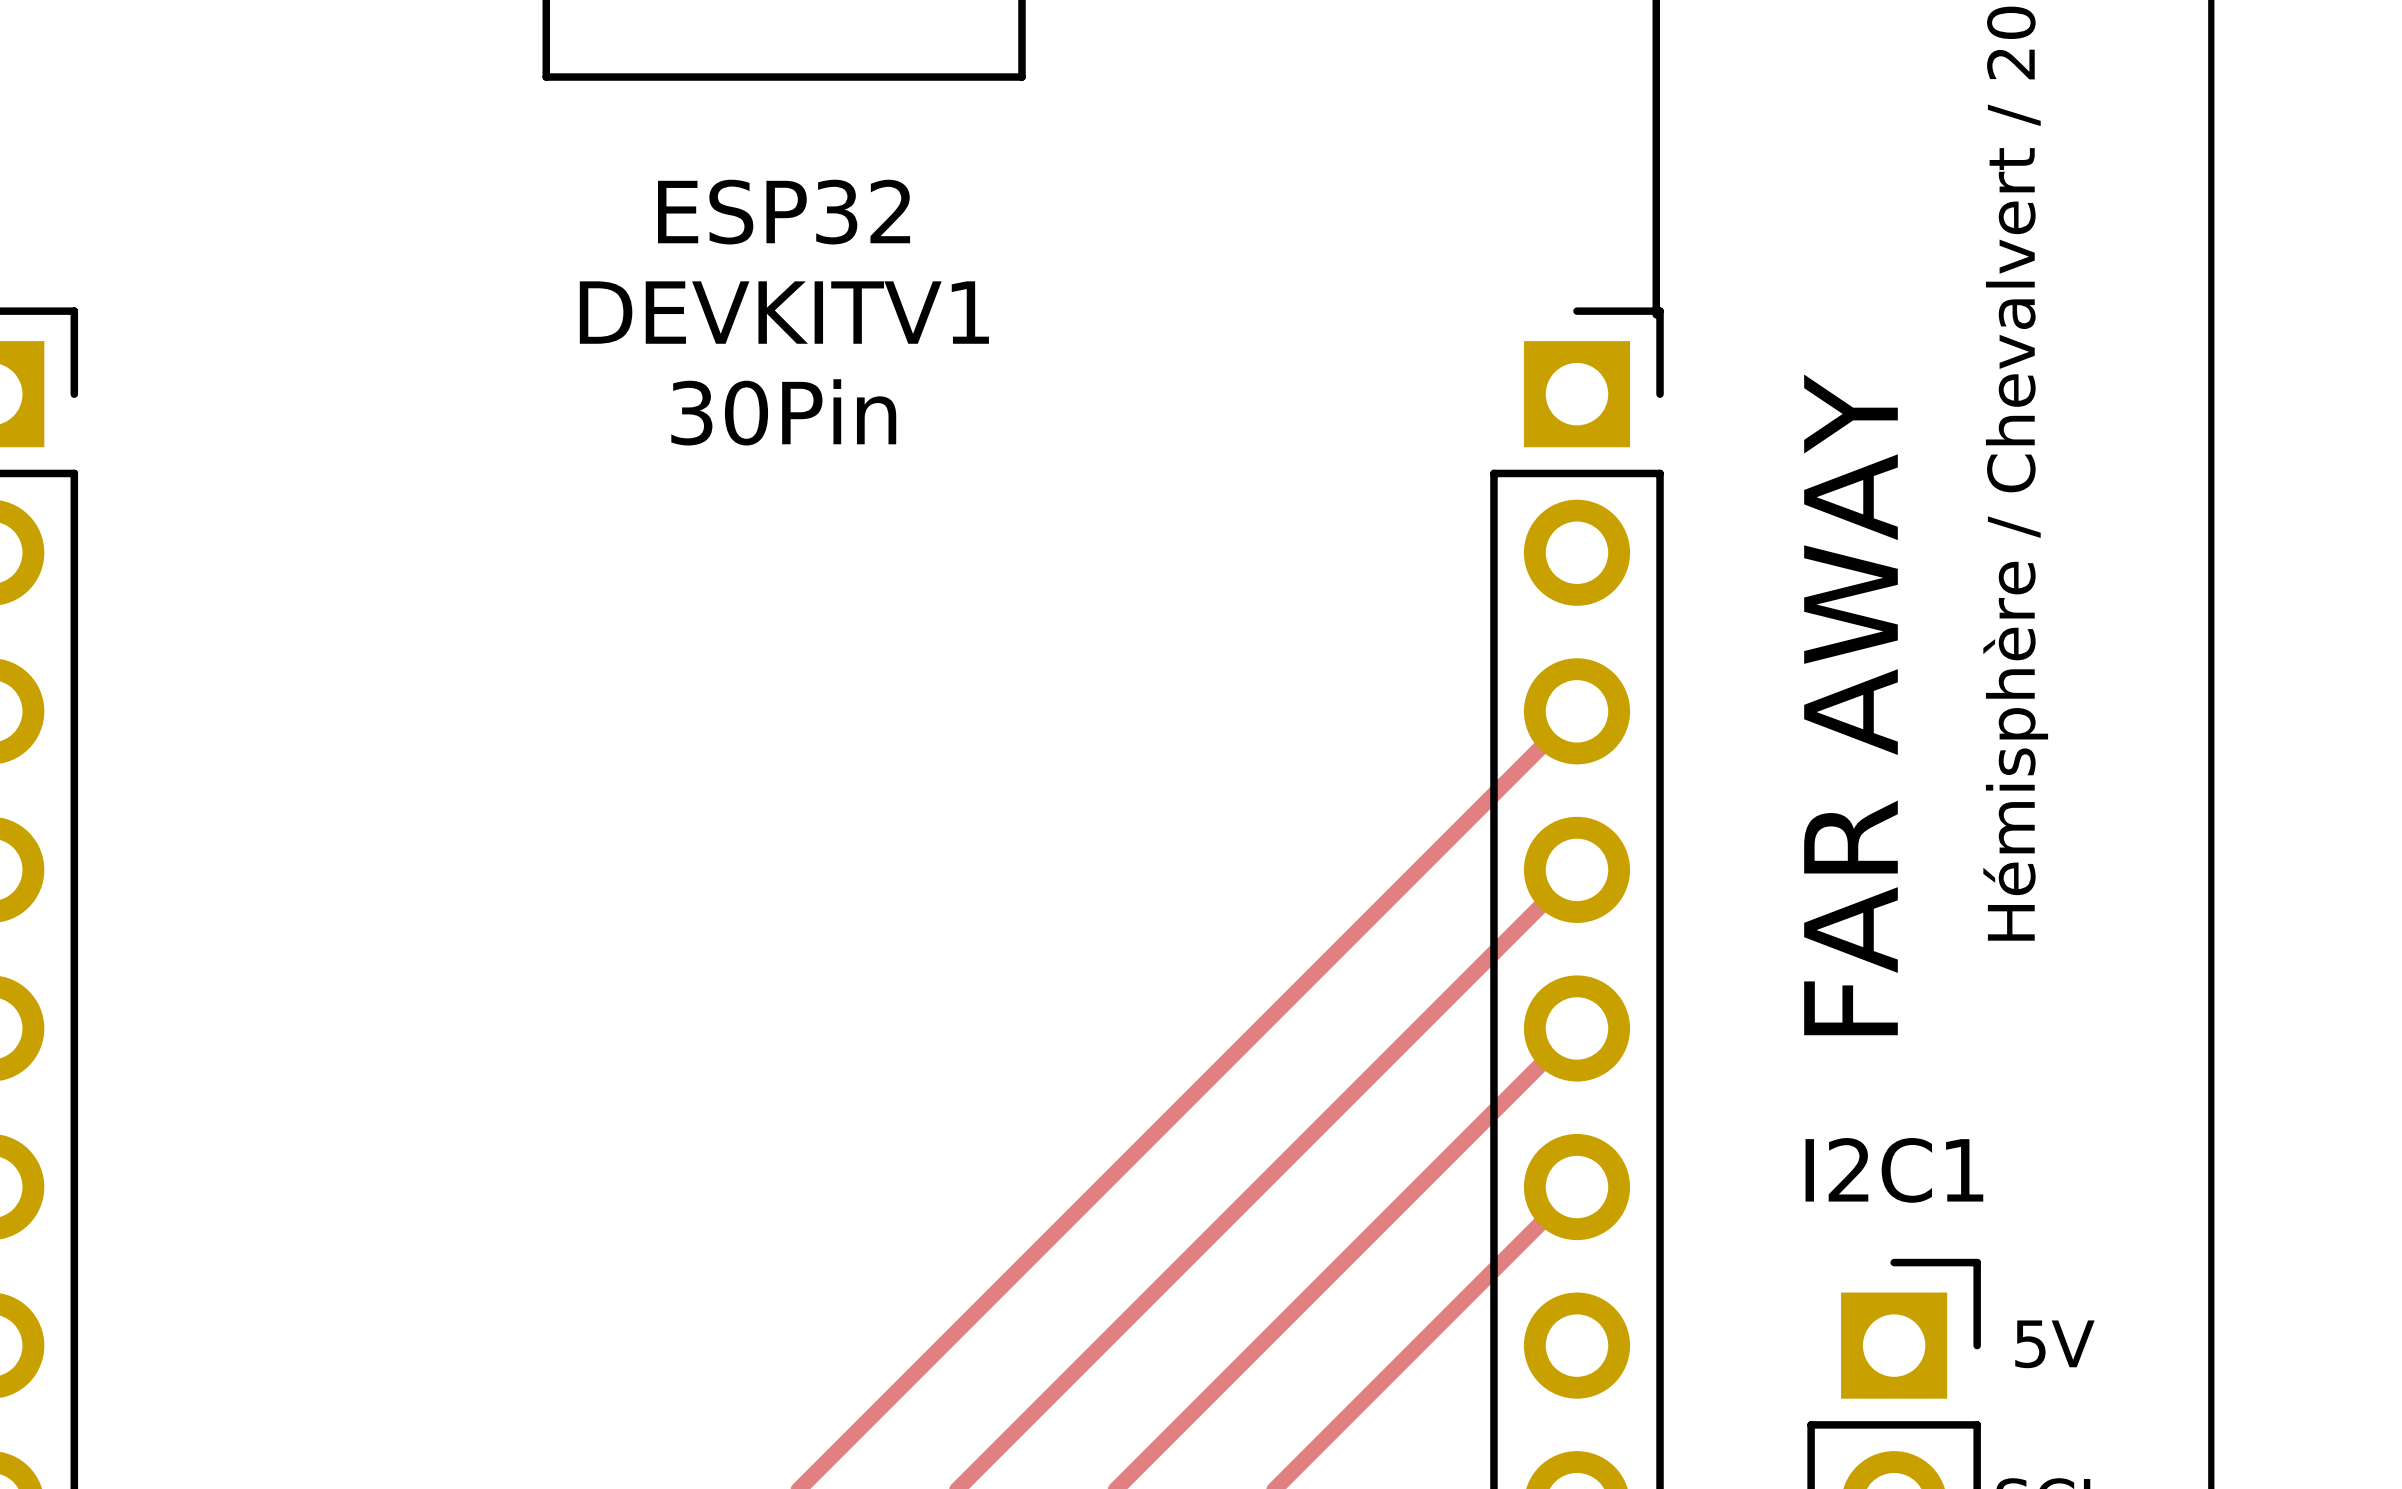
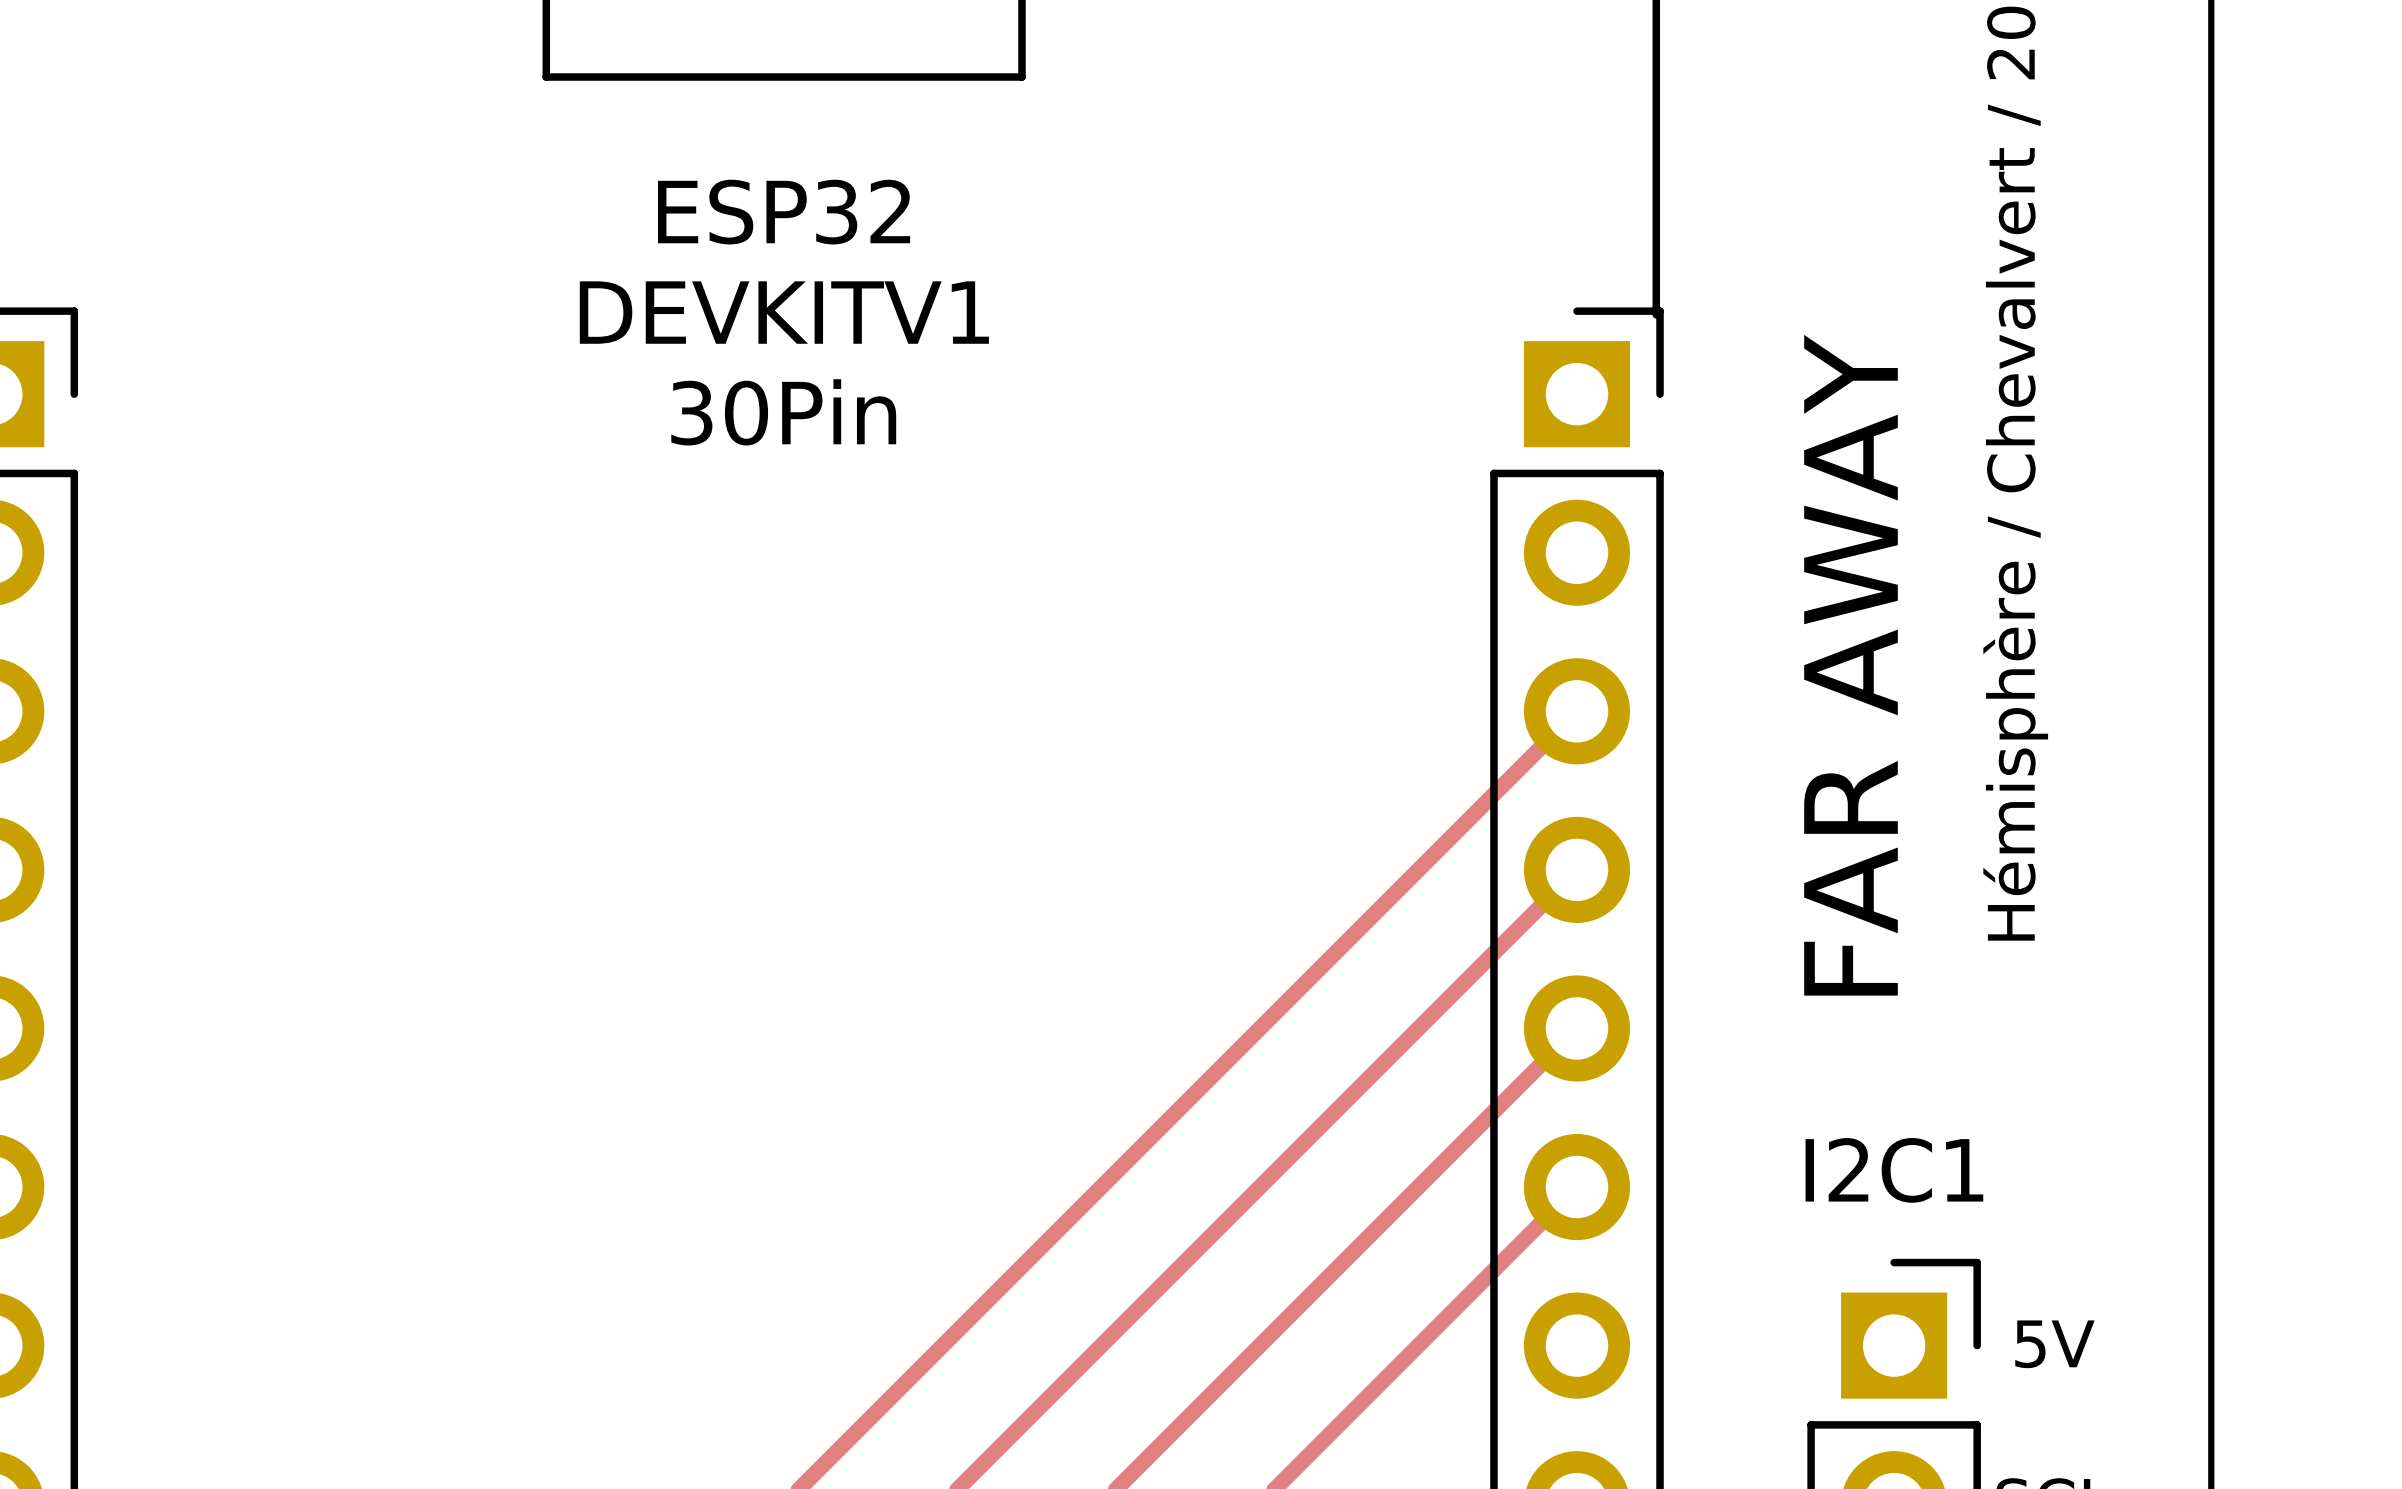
text position: FAR AWAY (1850, 704) -> FAR AWAY (1850, 665)

